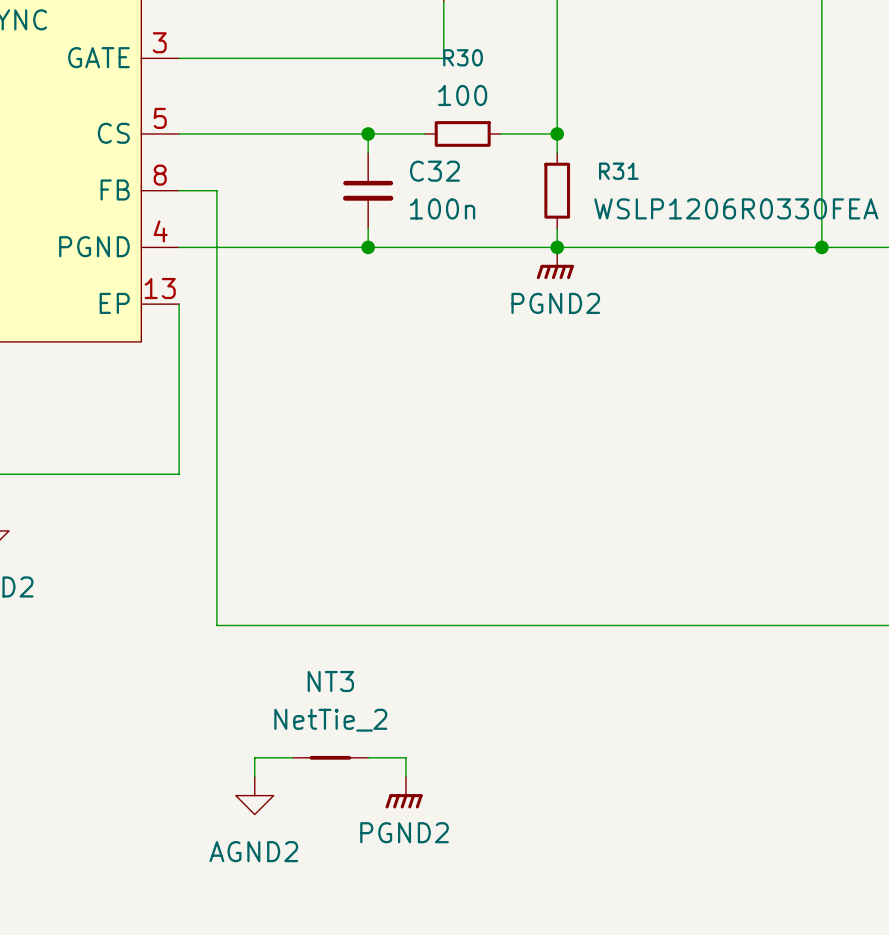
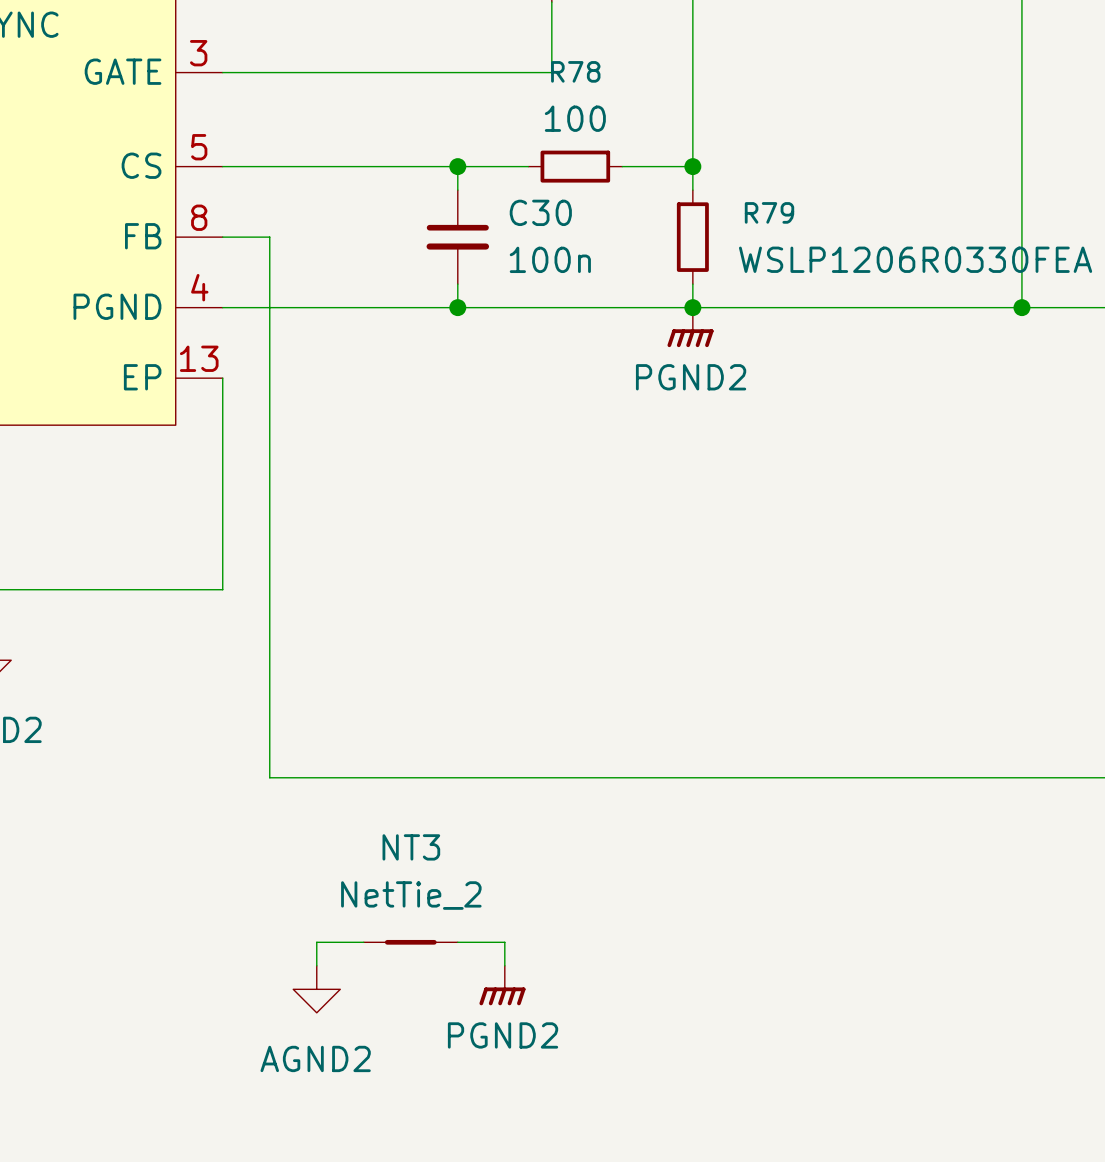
R30 name: R30 (463, 57) -> R78 (575, 71)
C32 name: C32 (434, 171) -> C30 (540, 212)
R31 name: R31 (618, 171) -> R79 (769, 212)

